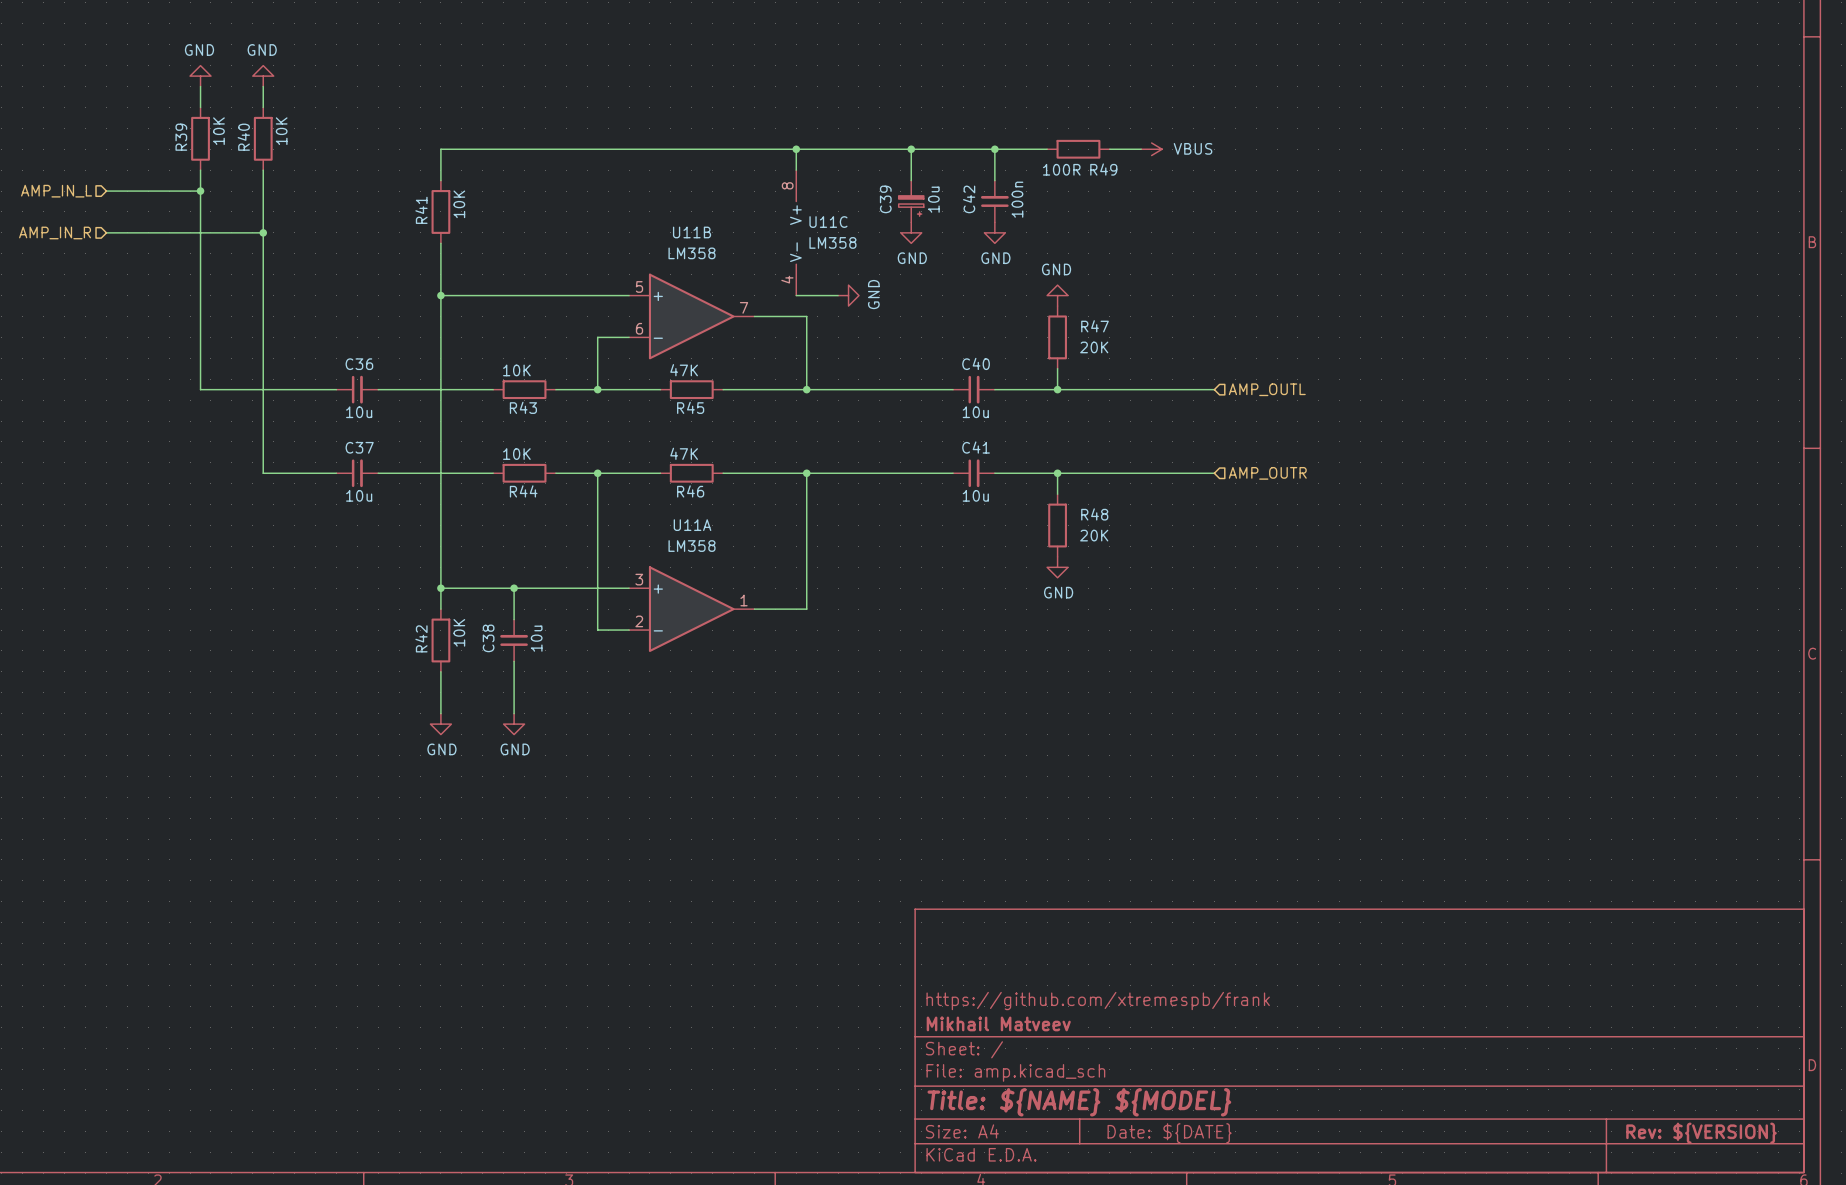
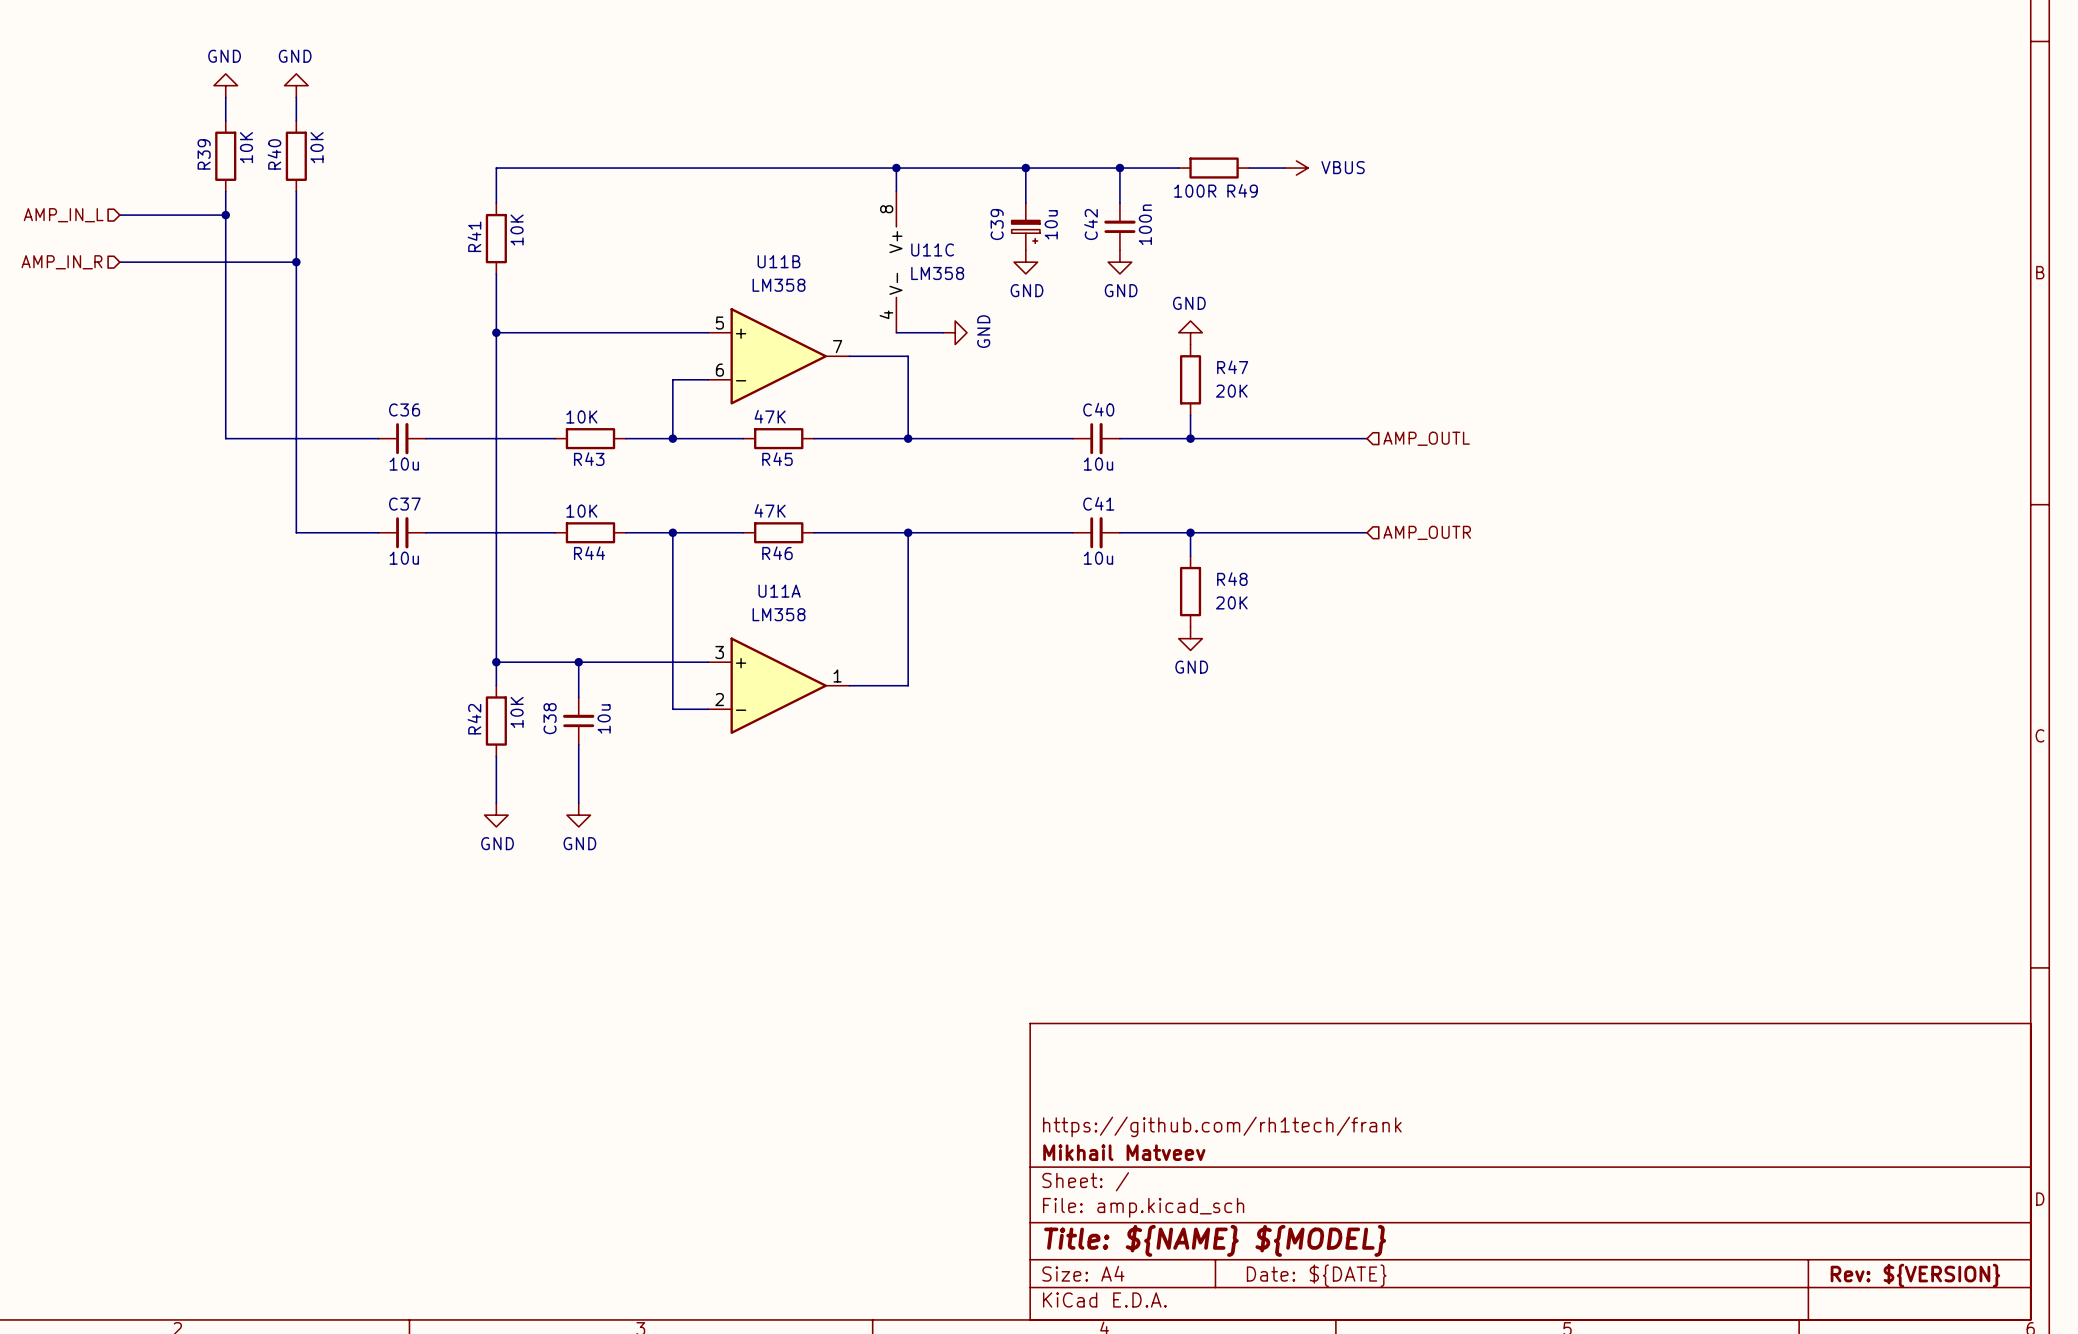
title block: https://github.com/xtremespb/frank (1098, 1001) -> https://github.com/rh1tech/frank (1222, 1126)

